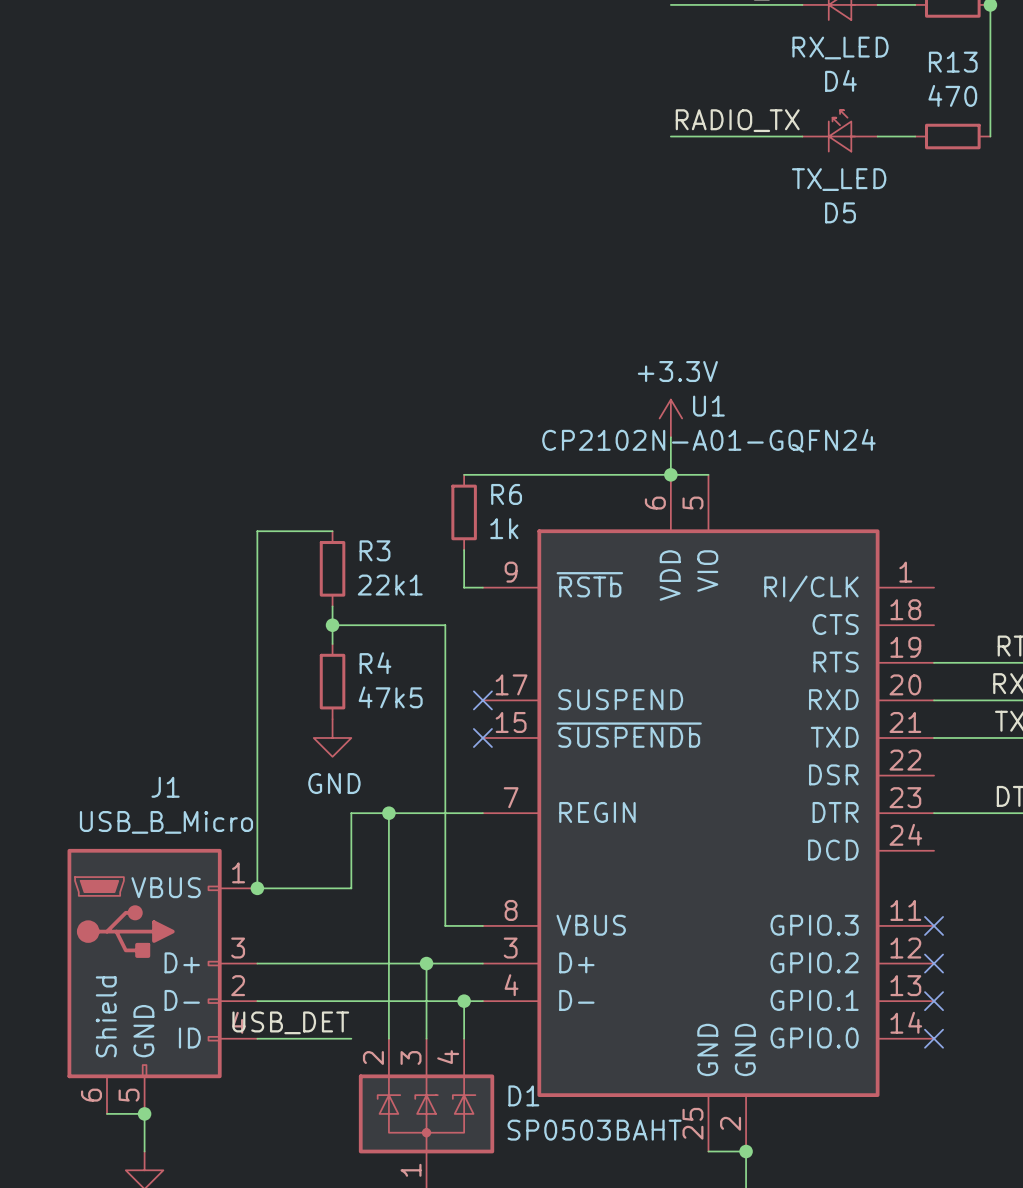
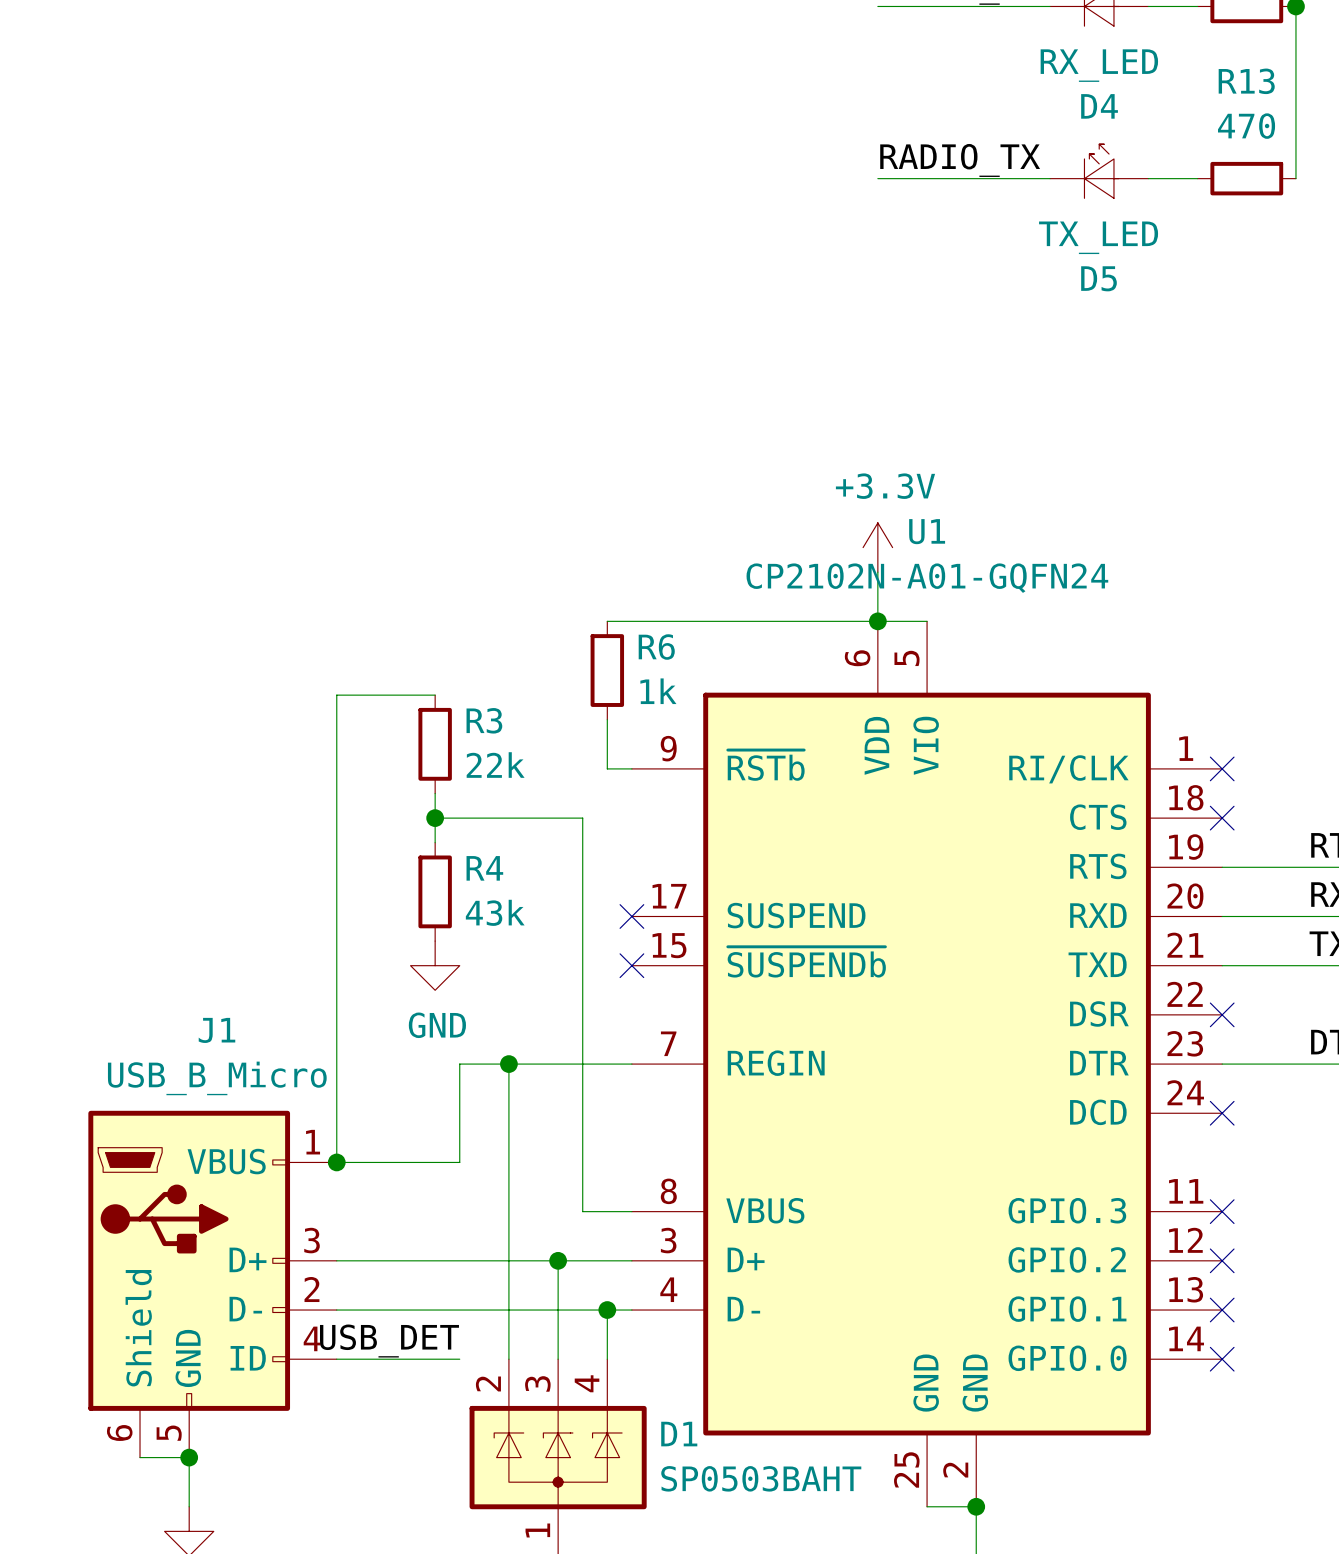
R3 value: 22k1 (390, 585) -> 22k (495, 765)
no-connect mark: none -> (1222, 768)
no-connect mark: none -> (1222, 818)
R4 value: 47k5 (390, 697) -> 43k (495, 912)
no-connect mark: none -> (1222, 1014)
no-connect mark: none -> (1222, 1113)

